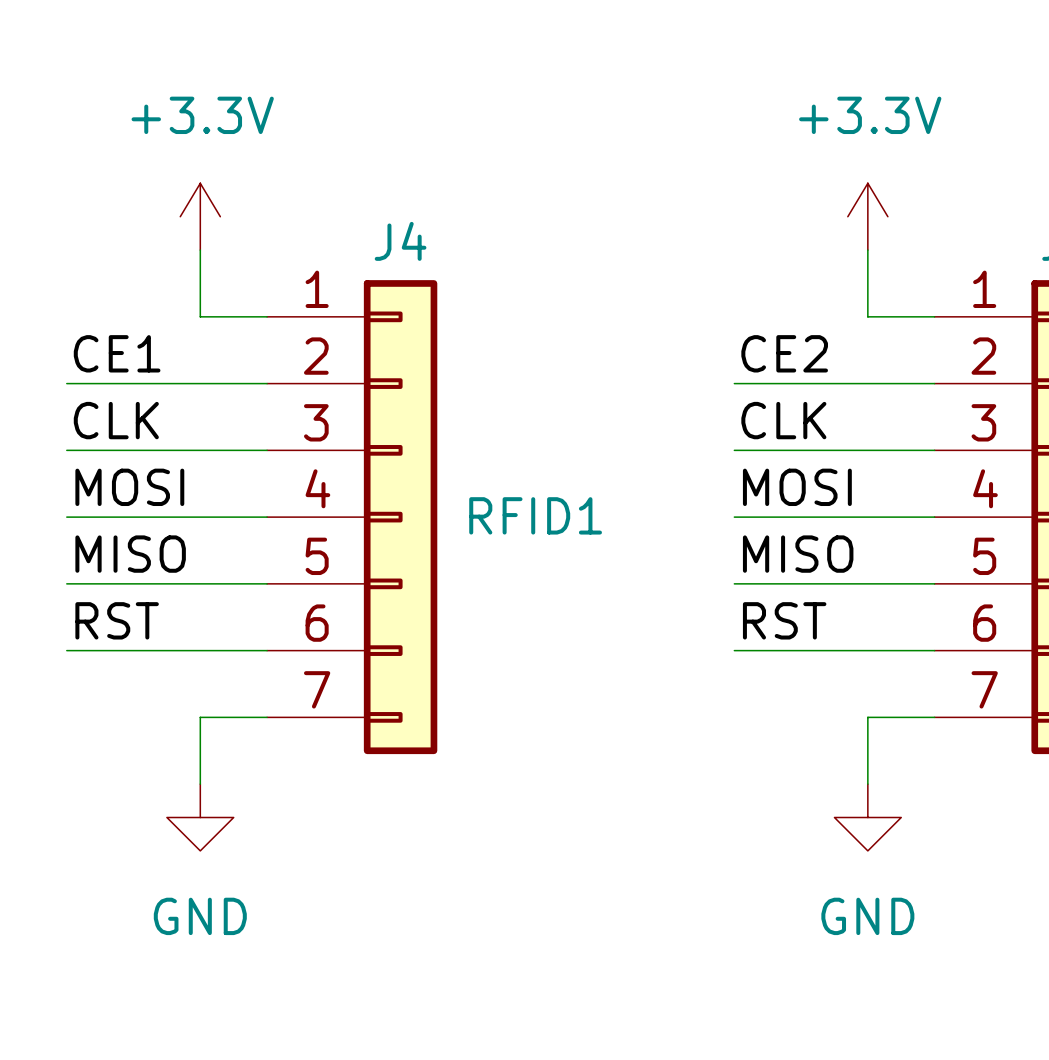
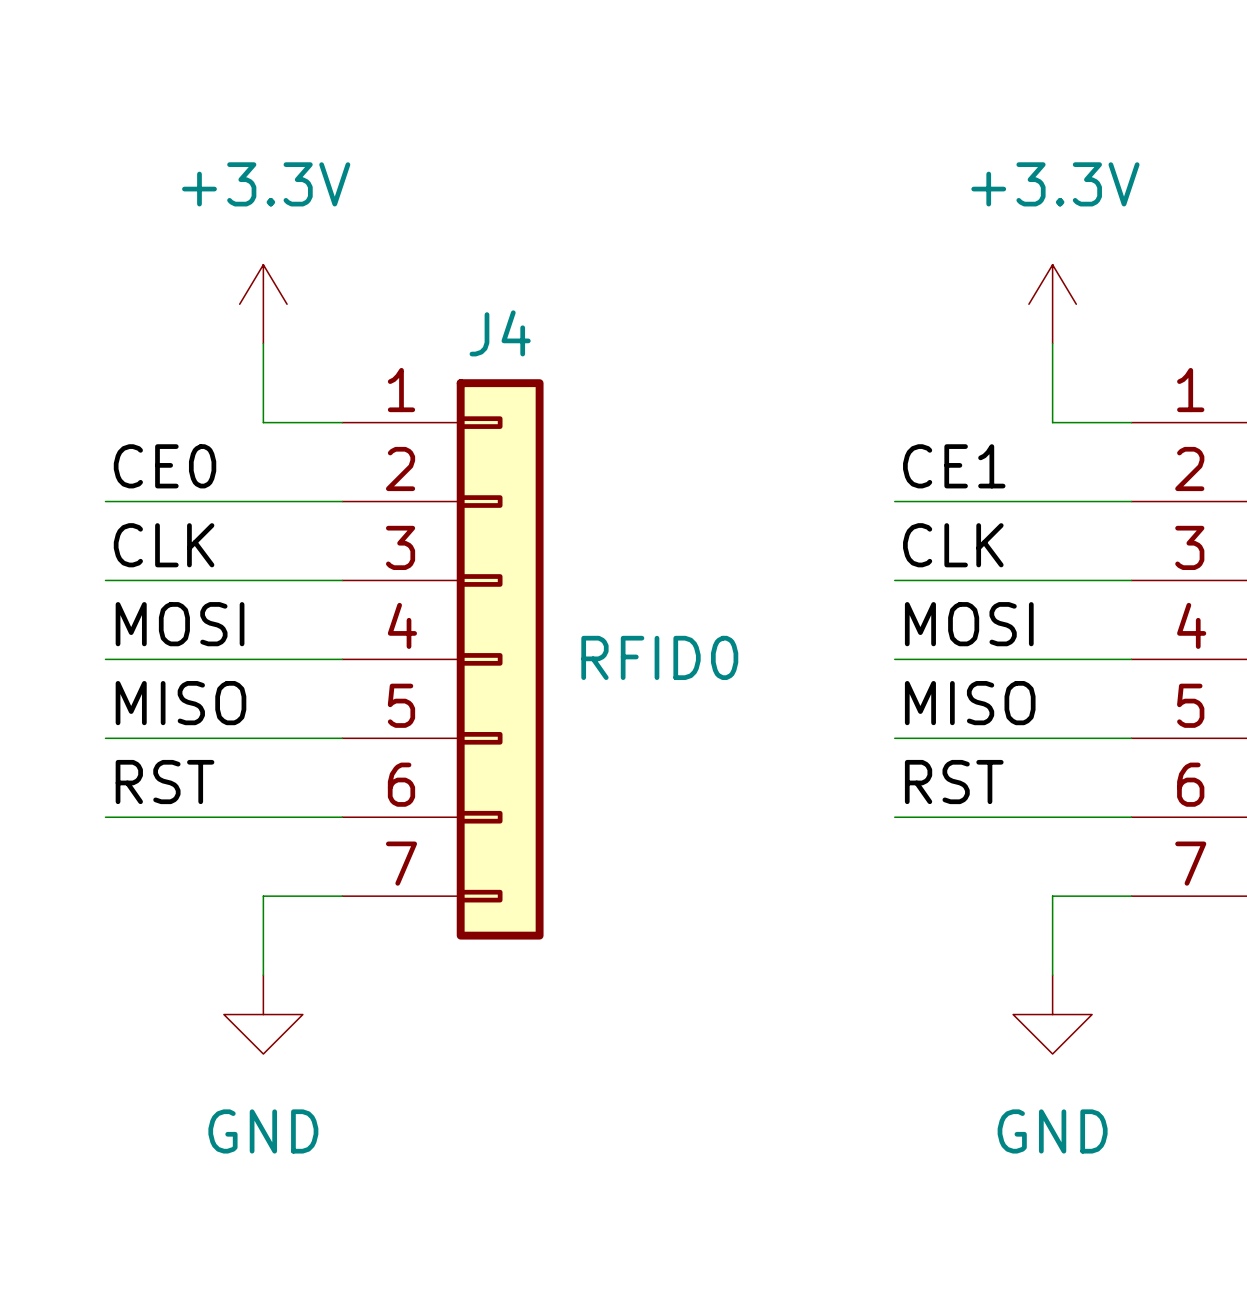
label: CE1 (117, 353) -> CE0 (165, 466)
label: CE2 (784, 353) -> CE1 (954, 466)
J4 value: RFID1 (535, 515) -> RFID0 (659, 657)

